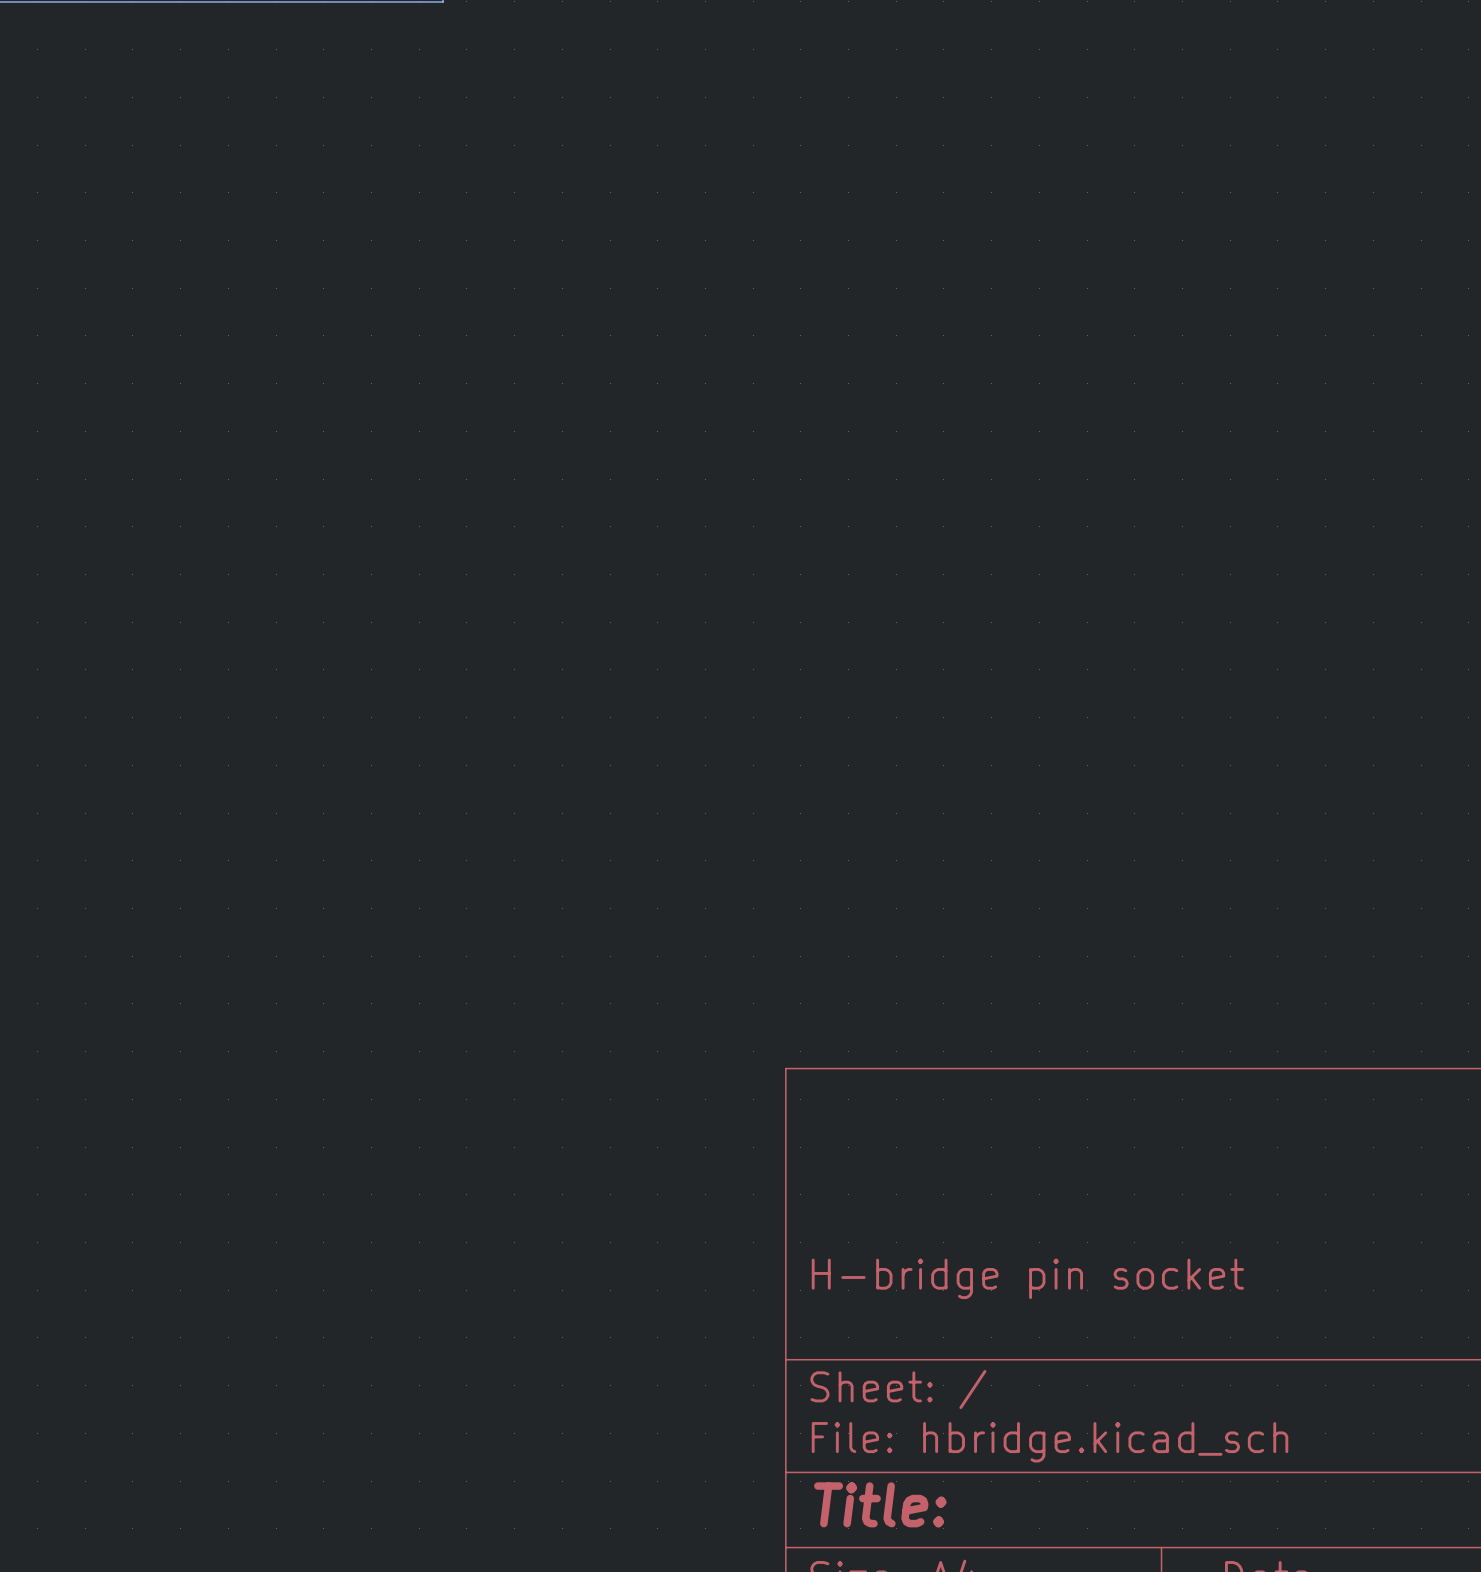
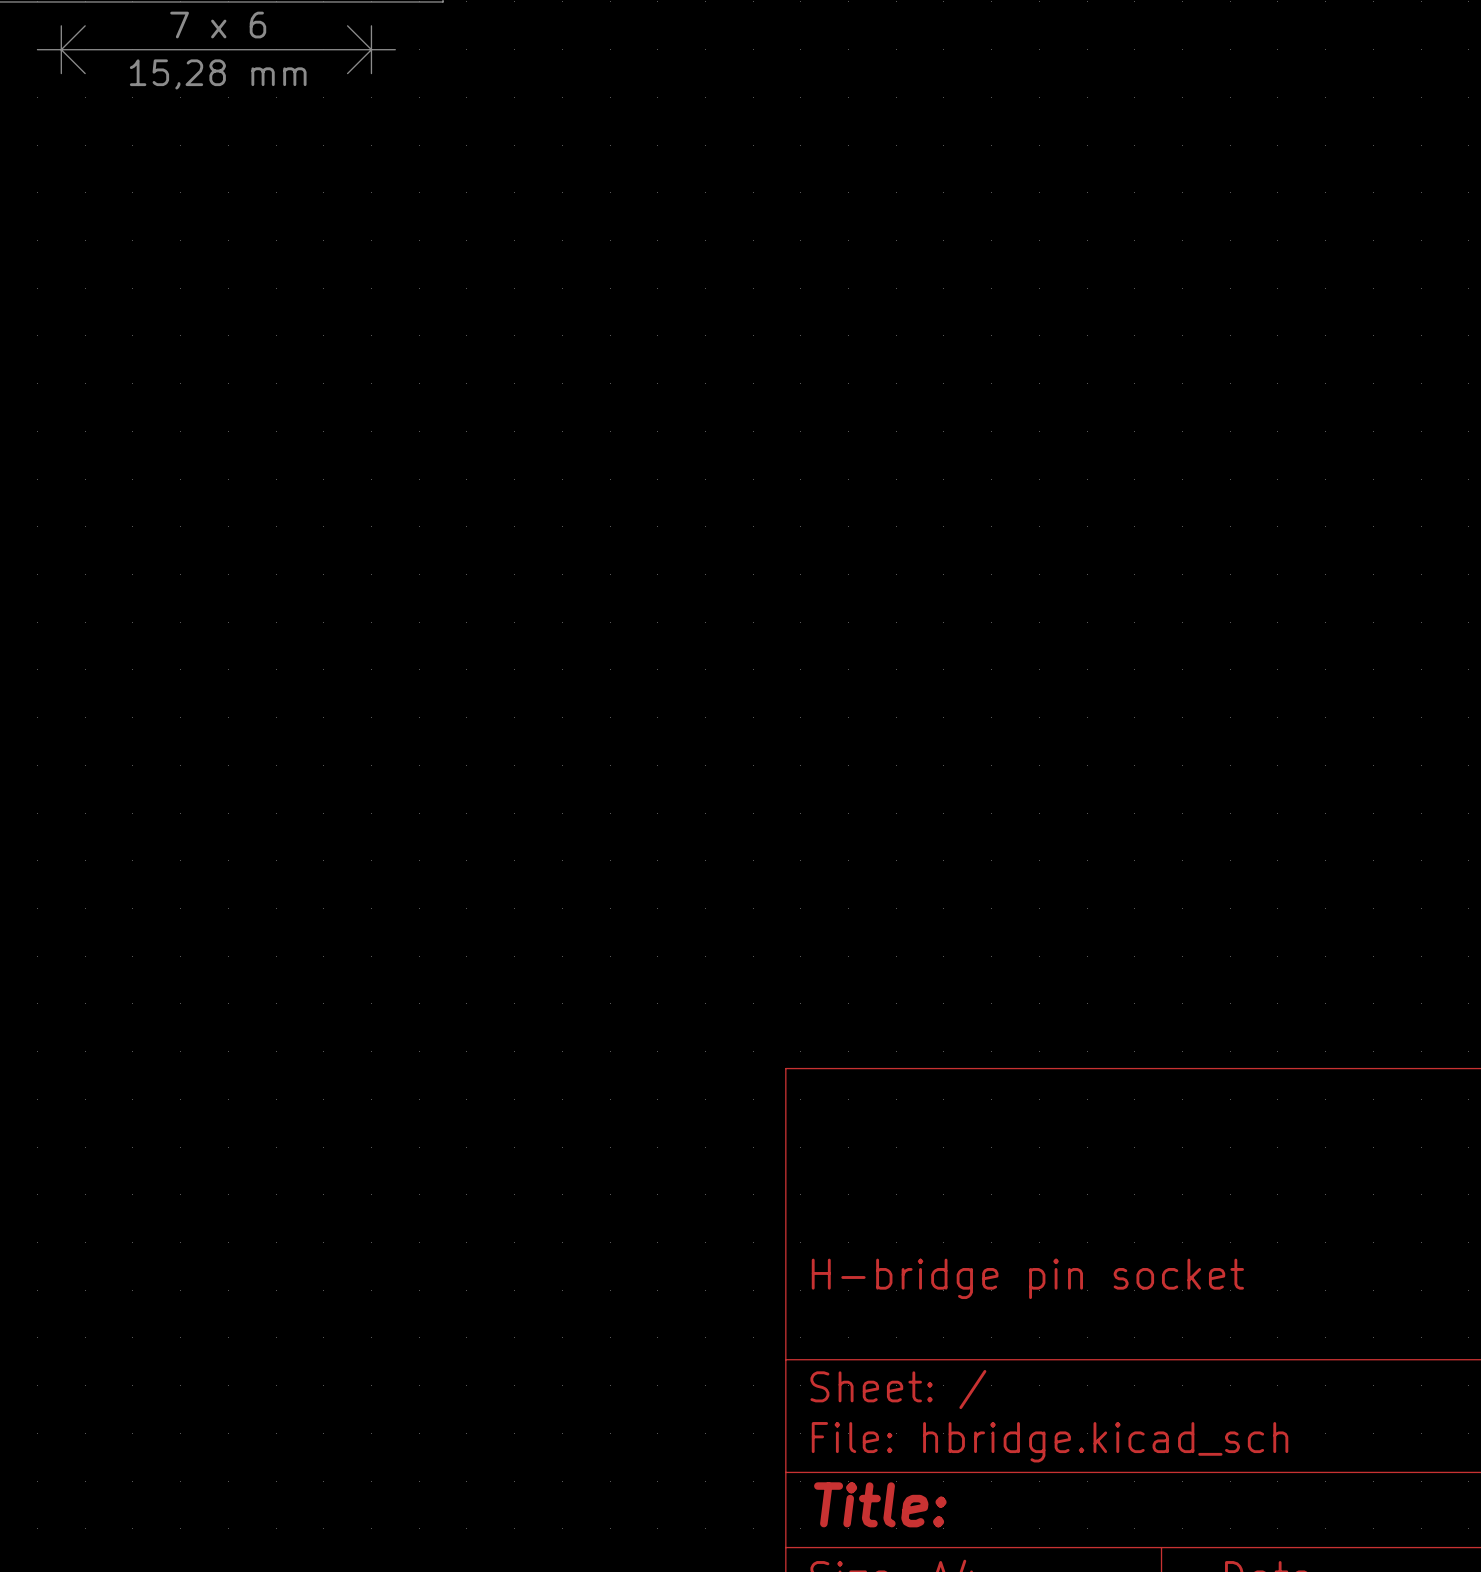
line: none -> (61, 25) (61, 73)
line: none -> (85, 25) (61, 49) (85, 73)
text: none -> 7 x 6 (218, 25)
line: none -> (347, 25) (371, 49) (347, 73)
line: none -> (371, 25) (371, 73)
line: none -> (37, 49) (395, 49)
text: none -> 15,28 mm (218, 74)

